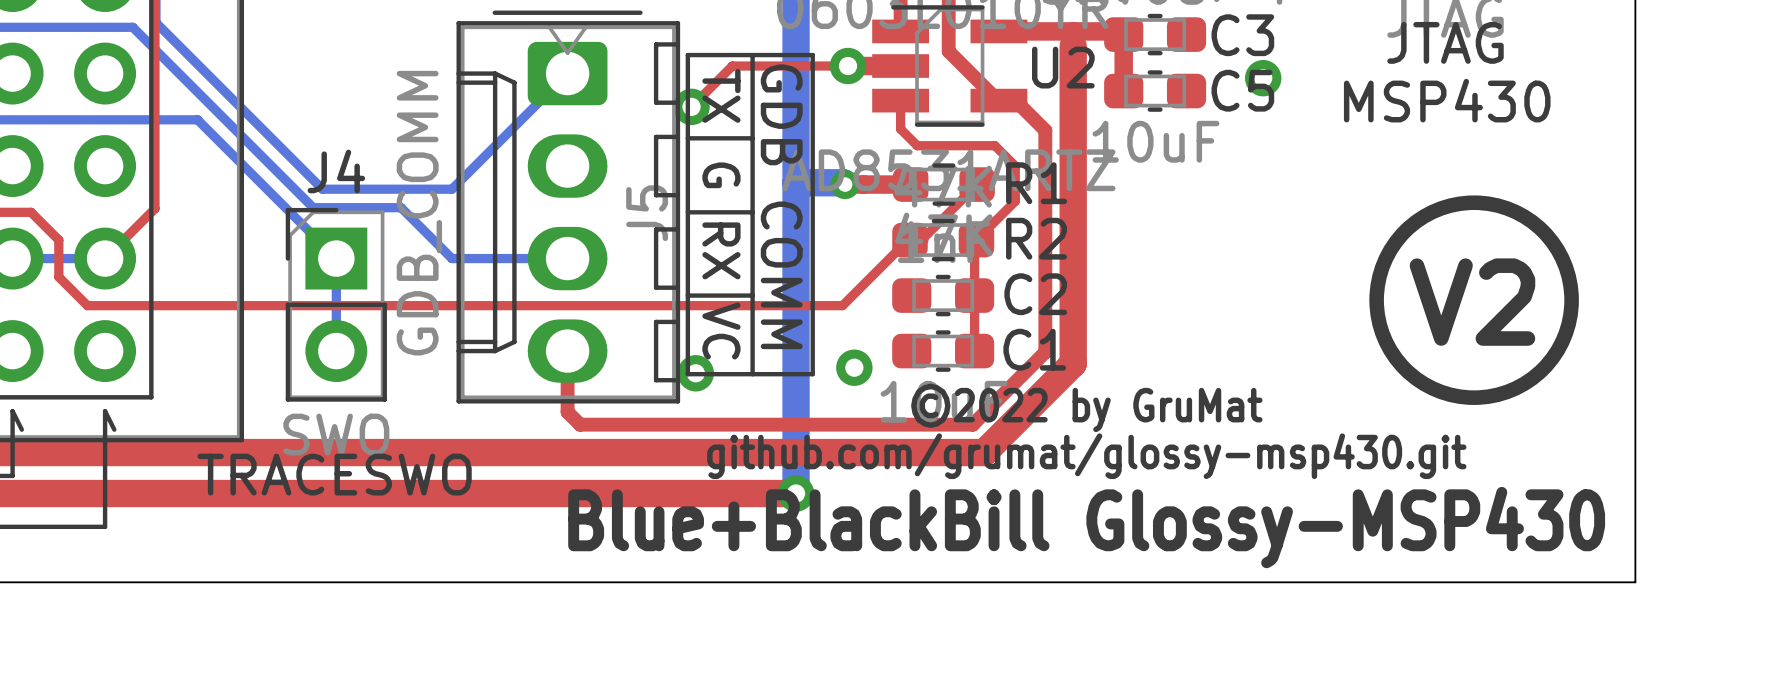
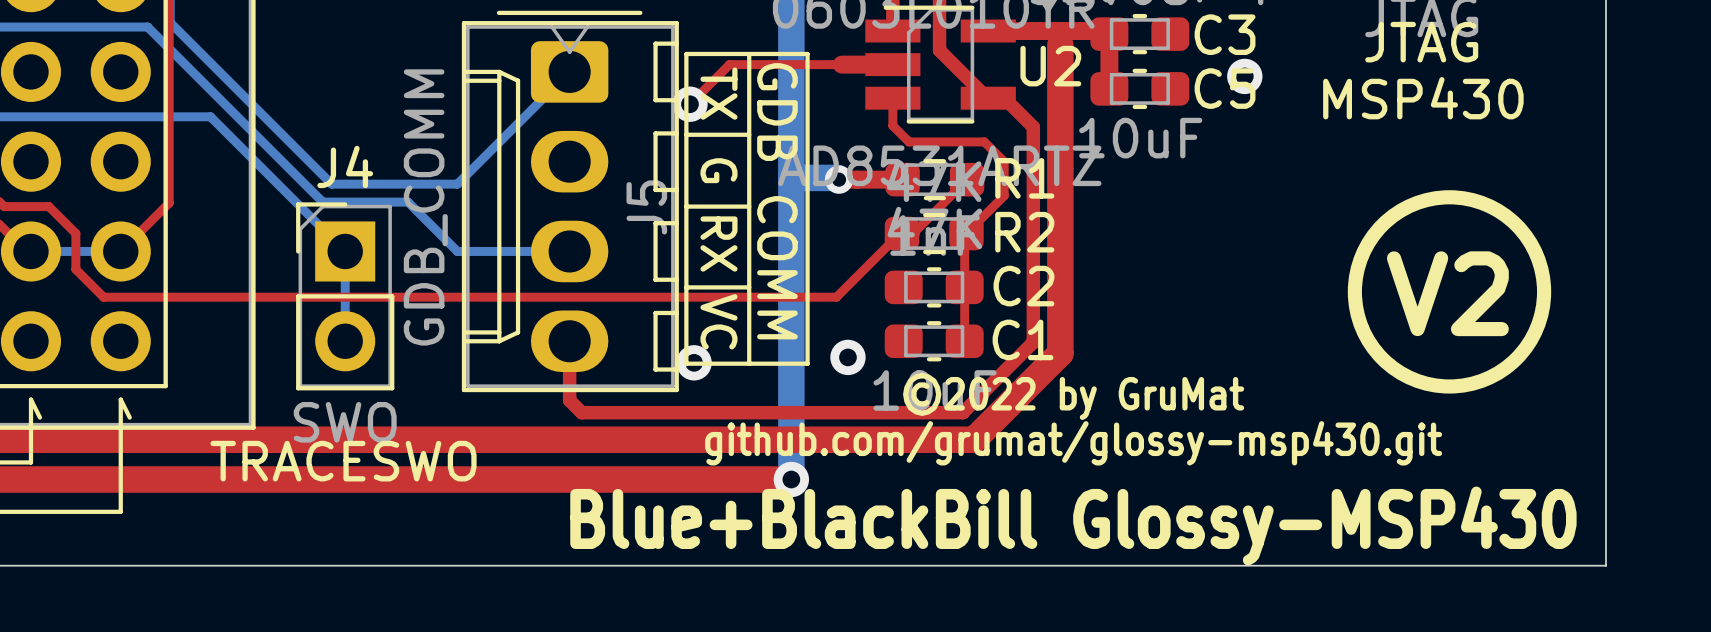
via: (848, 66) -> none
text position: Blue+BlackBill Glossy-MSP430 (1086, 527) -> Blue+BlackBill Glossy-MSP430 (1073, 526)

